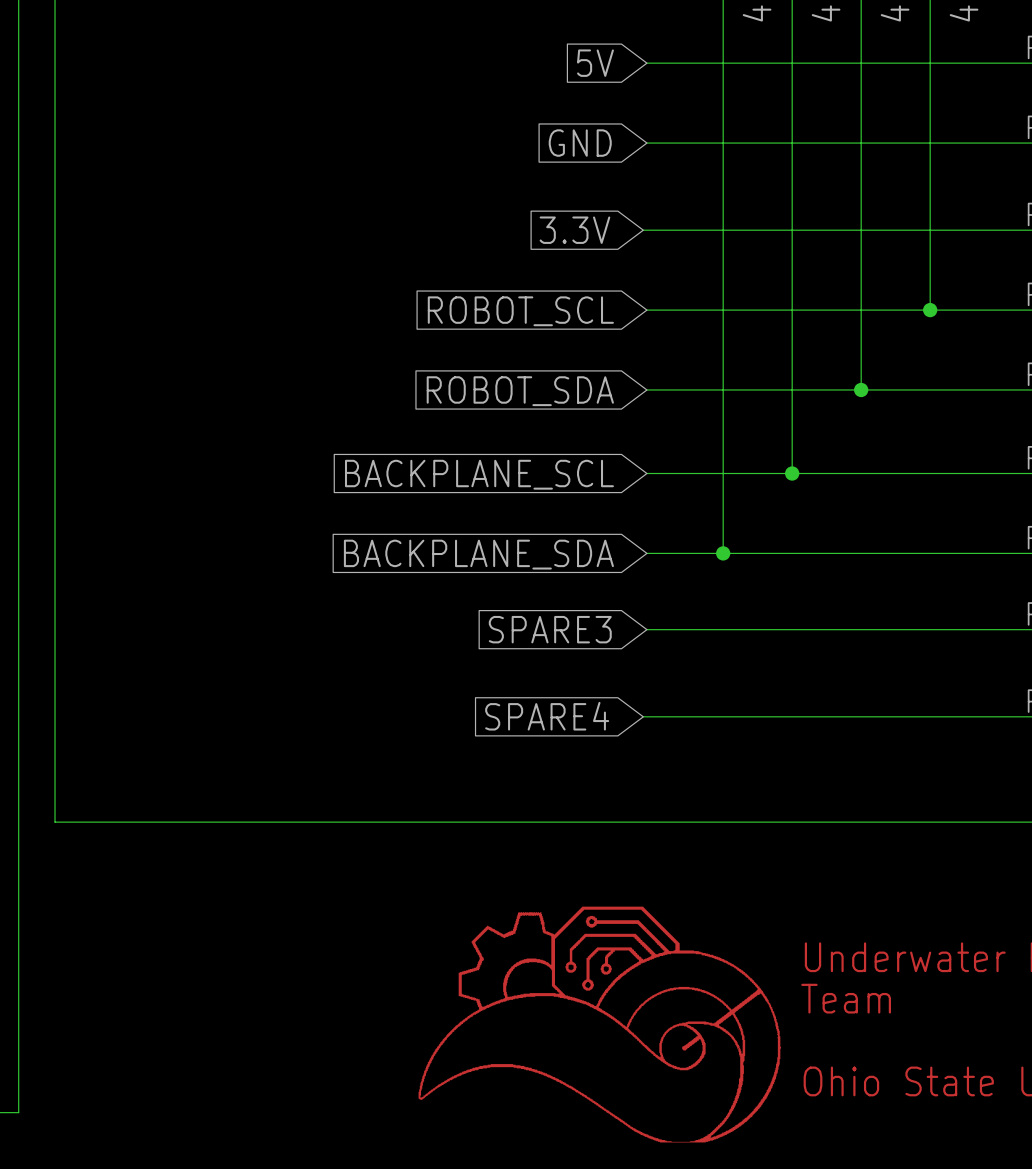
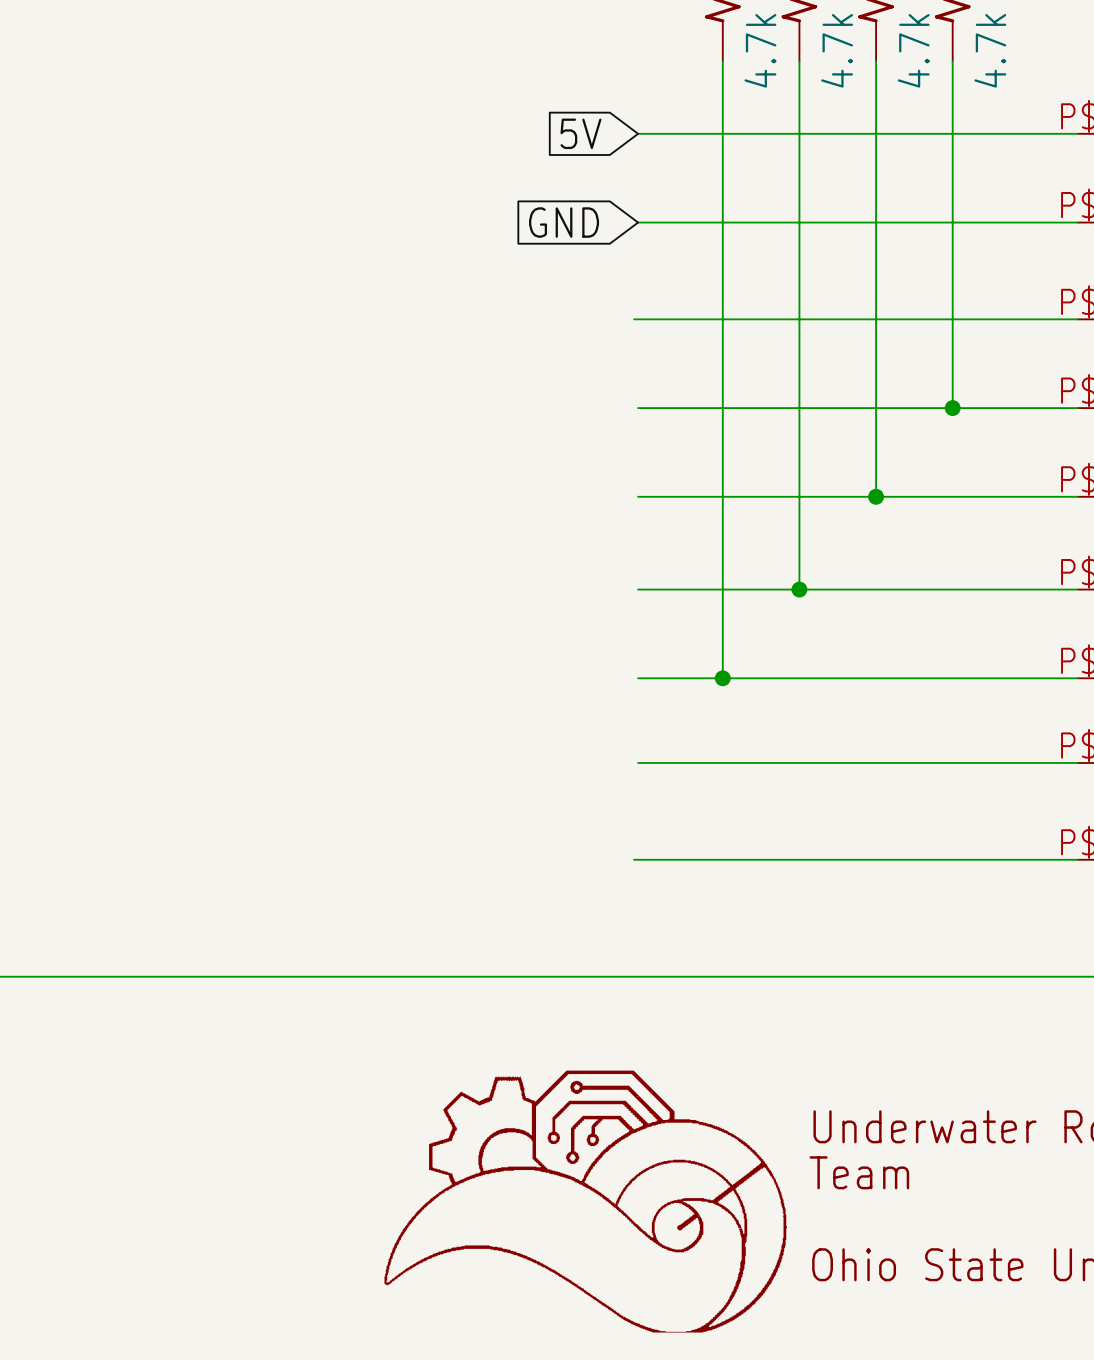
global label: 3.3V (574, 230) -> none
global label: ROBOT_SCL (520, 311) -> none
global label: ROBOT_SDA (520, 391) -> none
global label: BACKPLANE_SCL (479, 474) -> none
global label: BACKPLANE_SDA (478, 554) -> none
global label: SPARE3 (550, 629) -> none
global label: SPARE4 (547, 716) -> none

